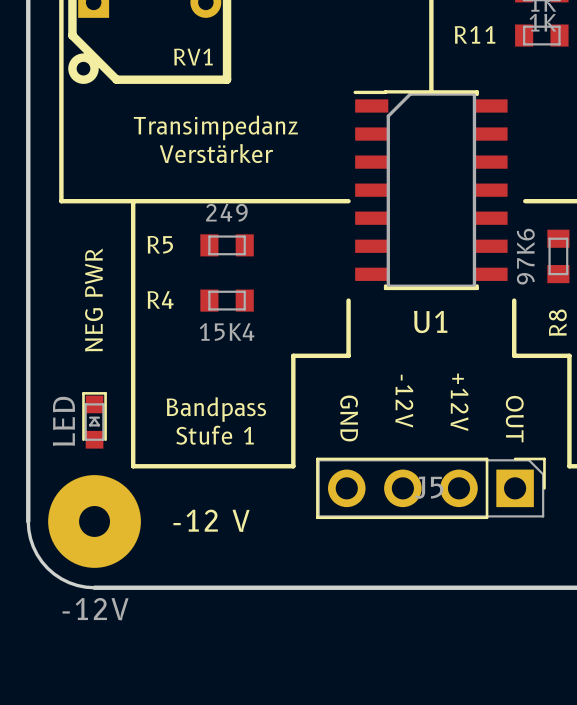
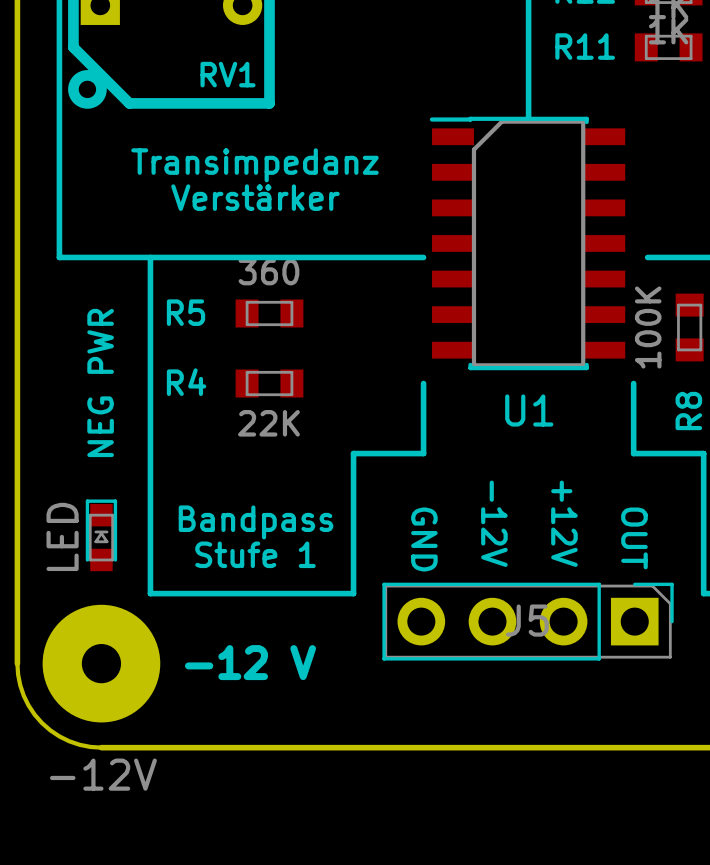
R5 value: 249 (226, 212) -> 360 (268, 272)
R8 value: 97K6 (525, 256) -> 100K (648, 327)
R4 value: 15K4 (227, 331) -> 22K (268, 423)

